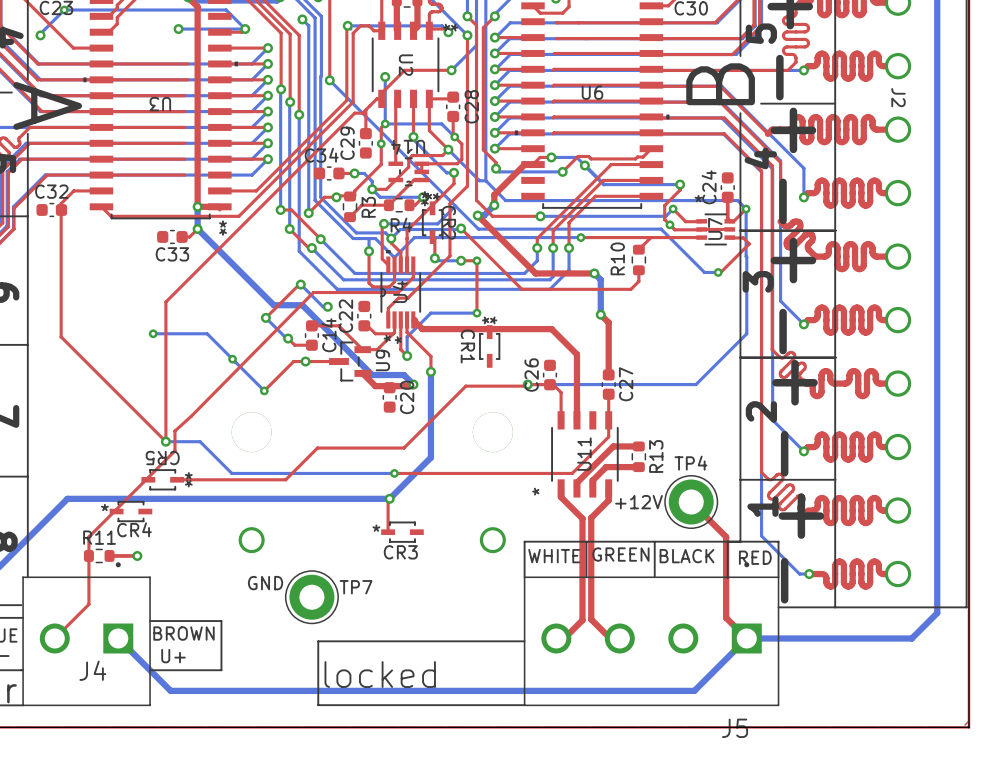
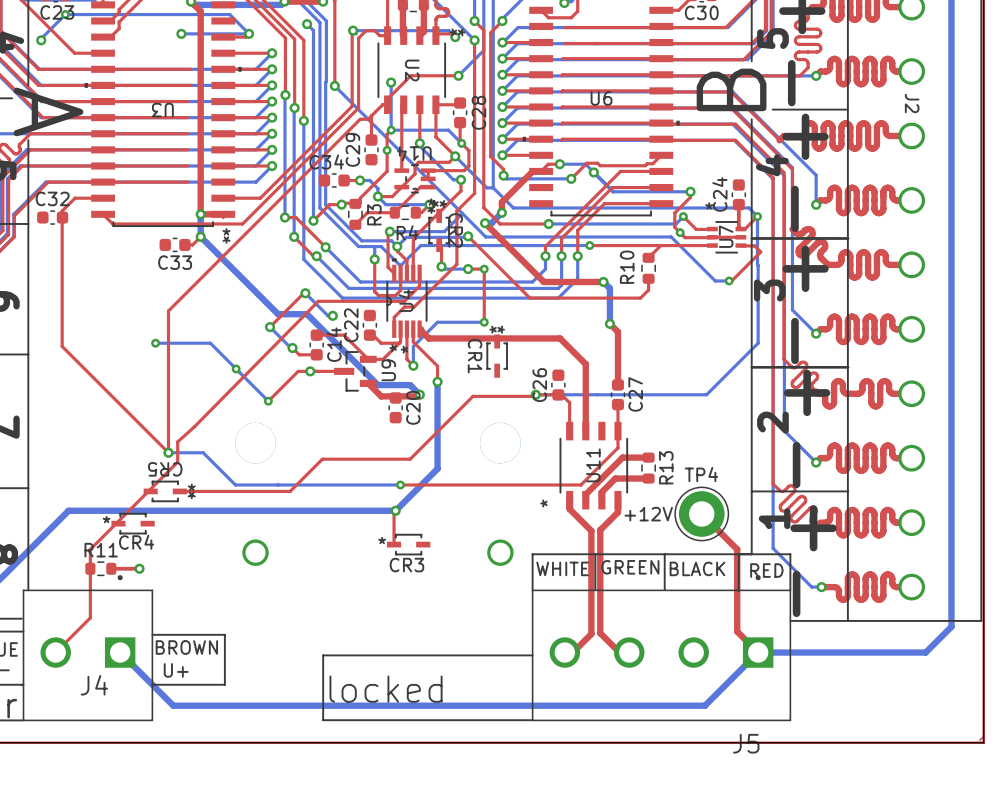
text: GND (265, 583) -> none
TP7: (311, 597) -> none

